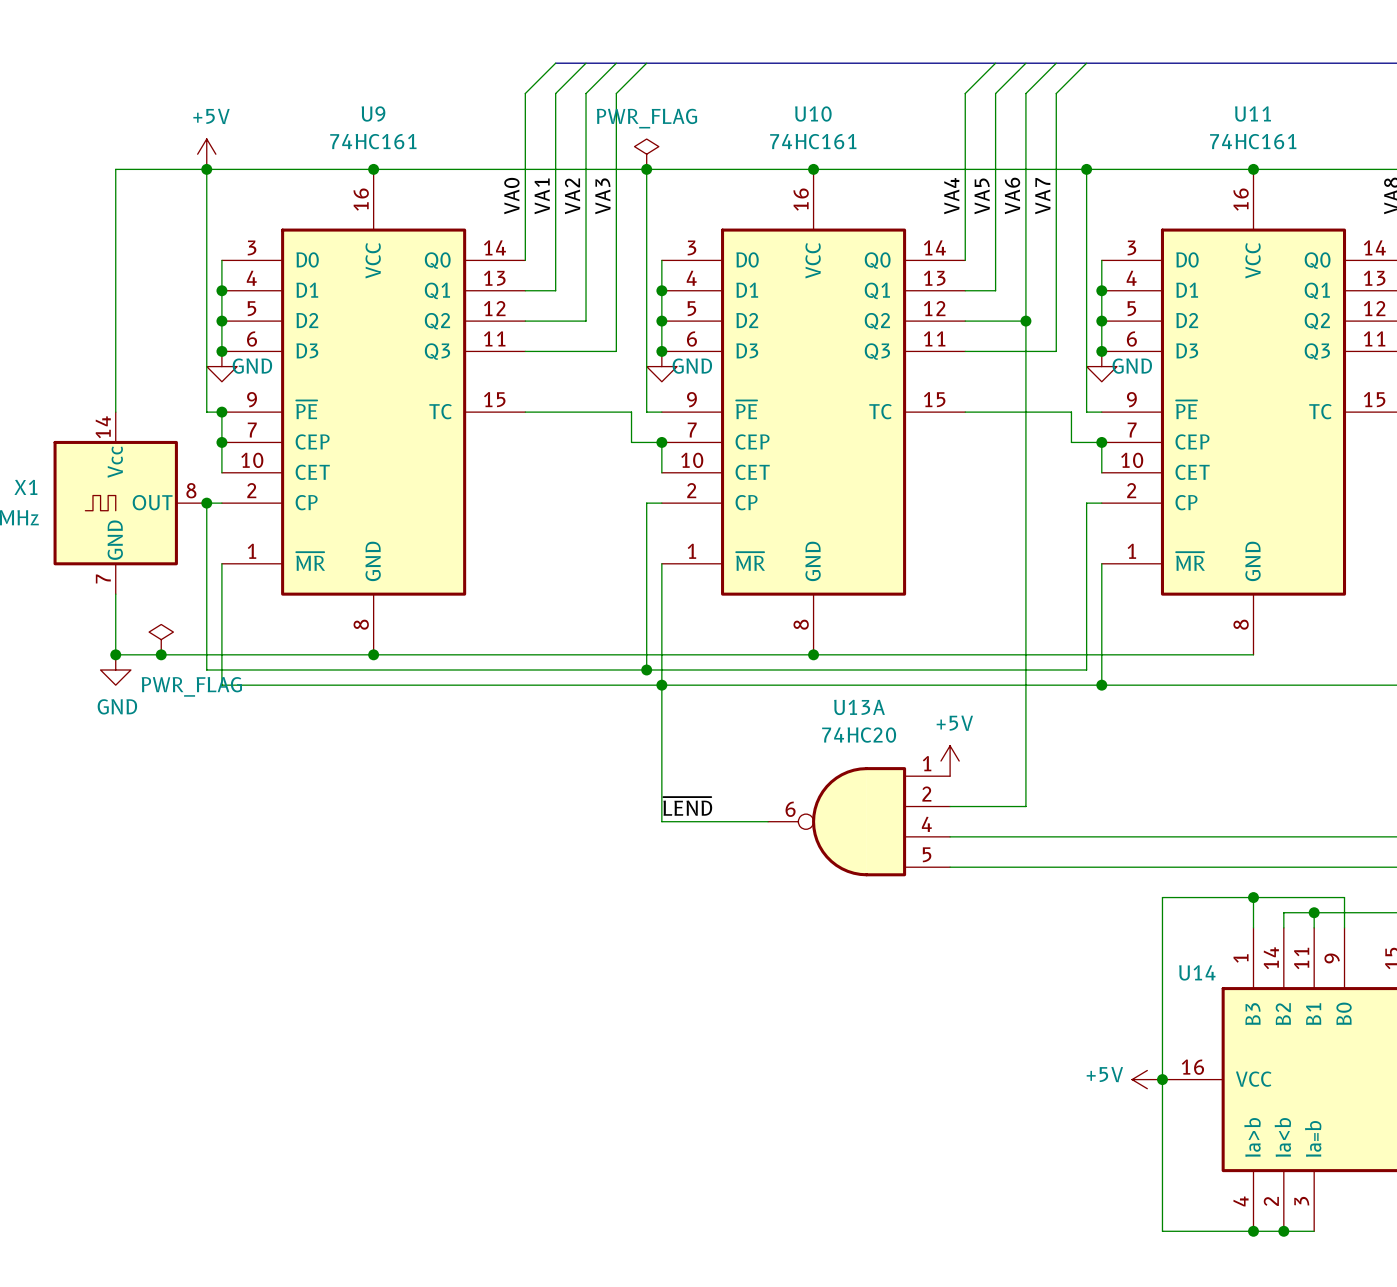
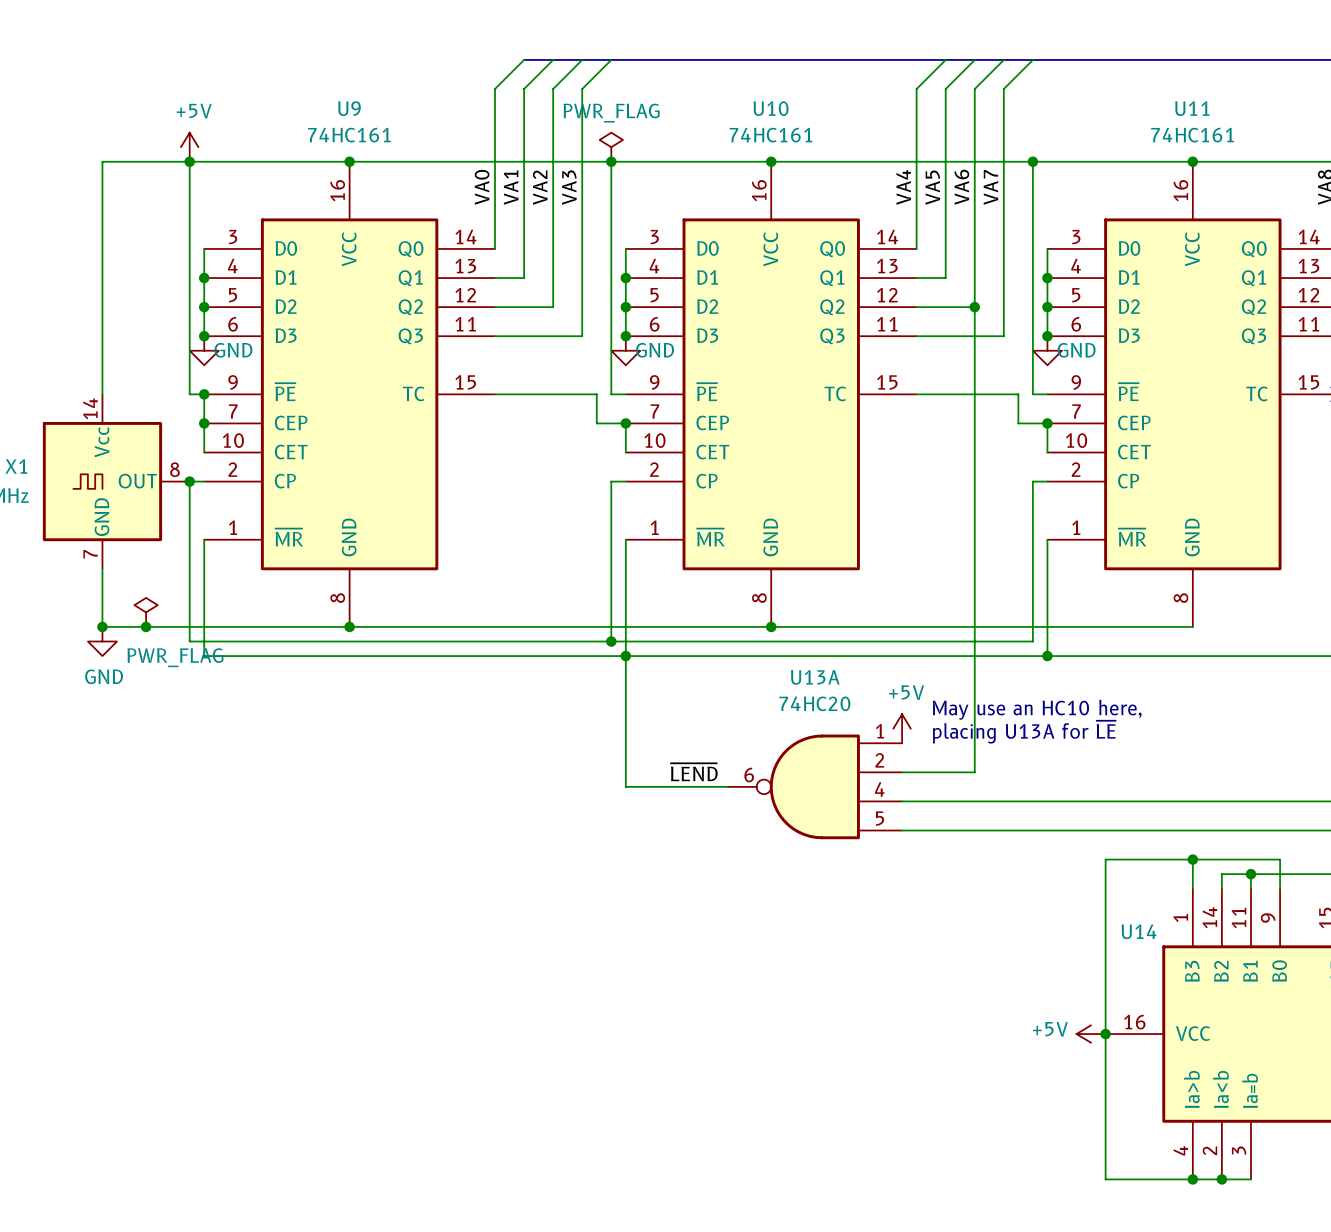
text: none -> May use an HC10 here, (1037, 709)
text: none -> placing U13A for ~{LE} (1024, 732)
label position: ~{LEND} (687, 806) -> ~{LEND} (694, 772)

